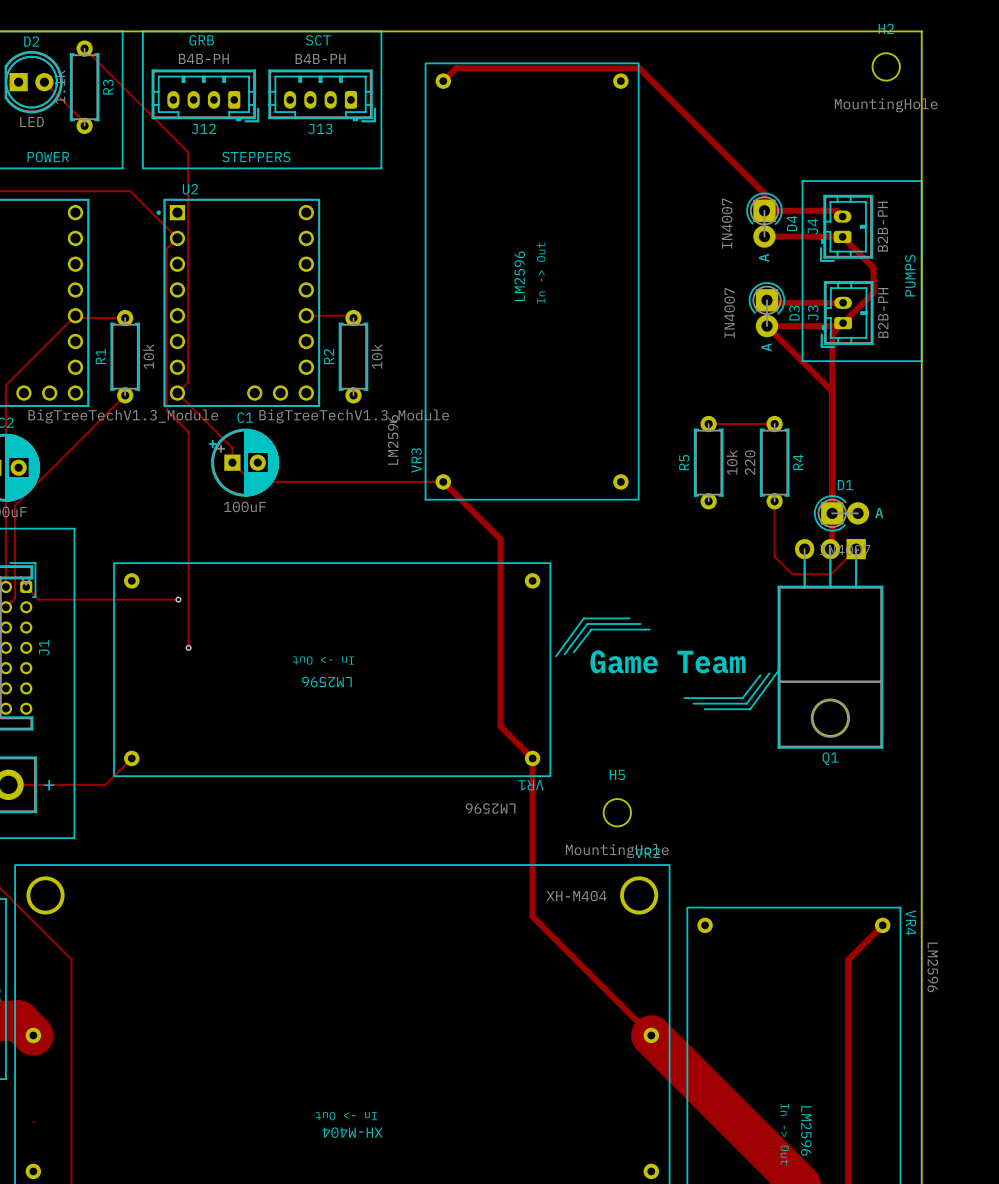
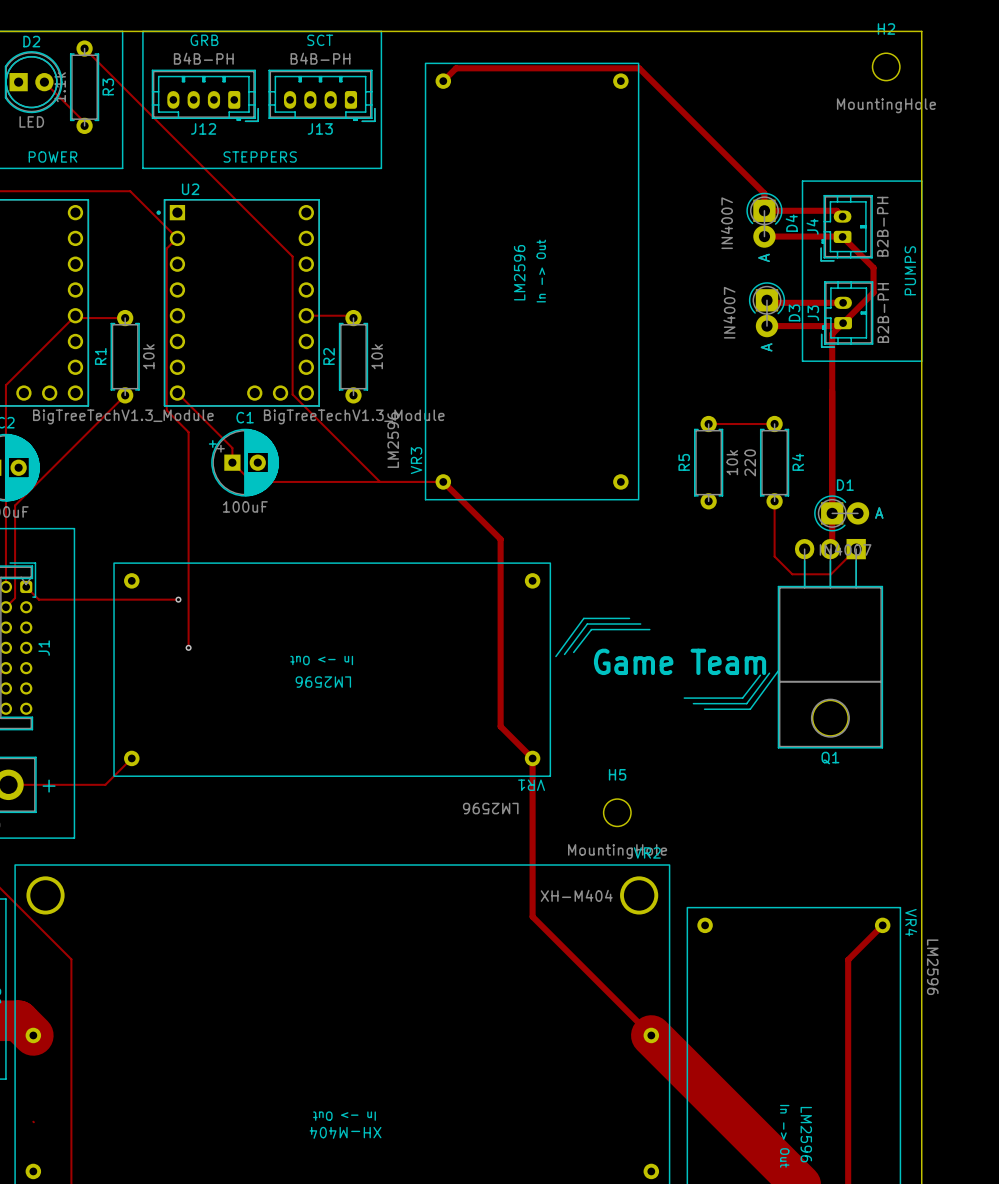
track: (188, 152) (188, 382) (177, 393) -> (188, 152) (292, 256) (292, 394) (380, 481)
track: (766, 326) (832, 391) -> none

